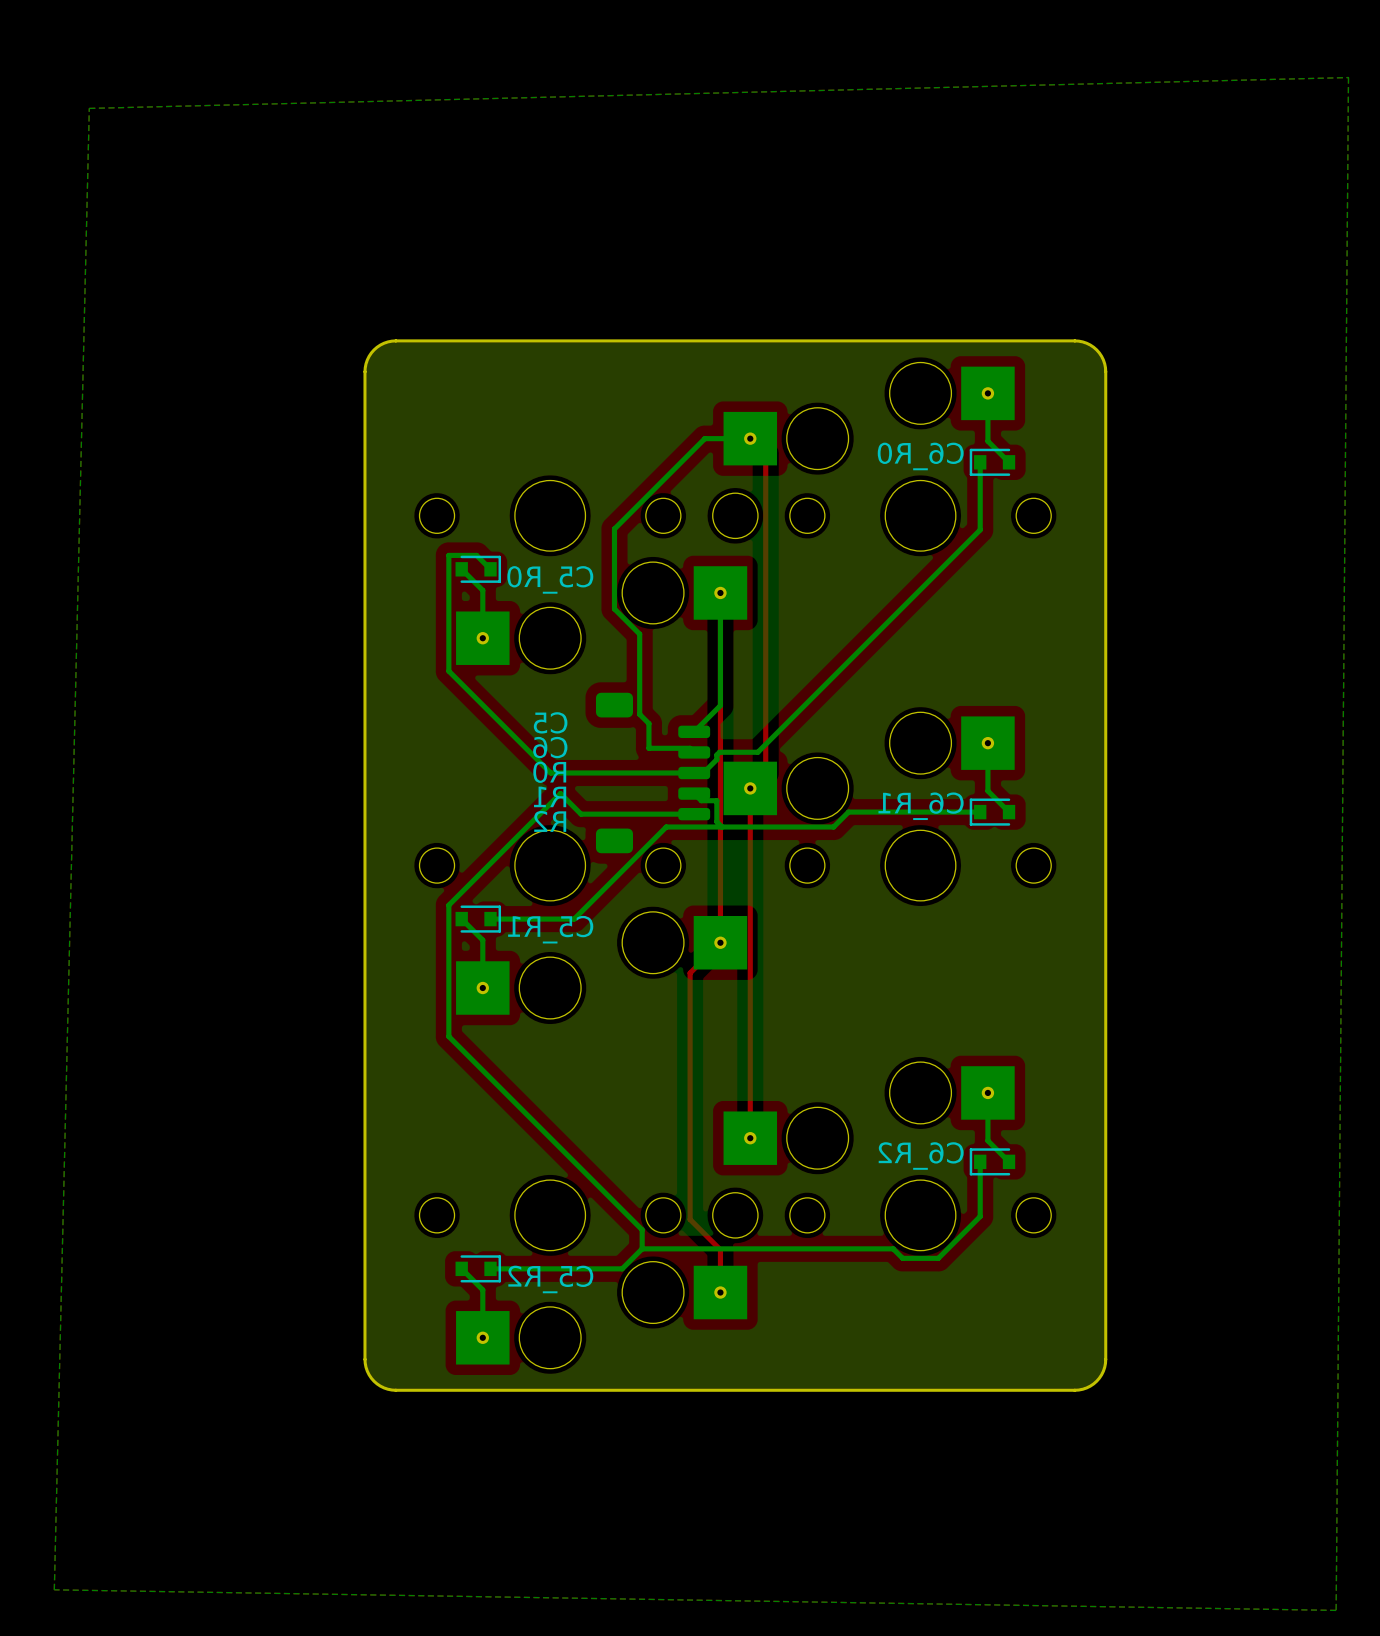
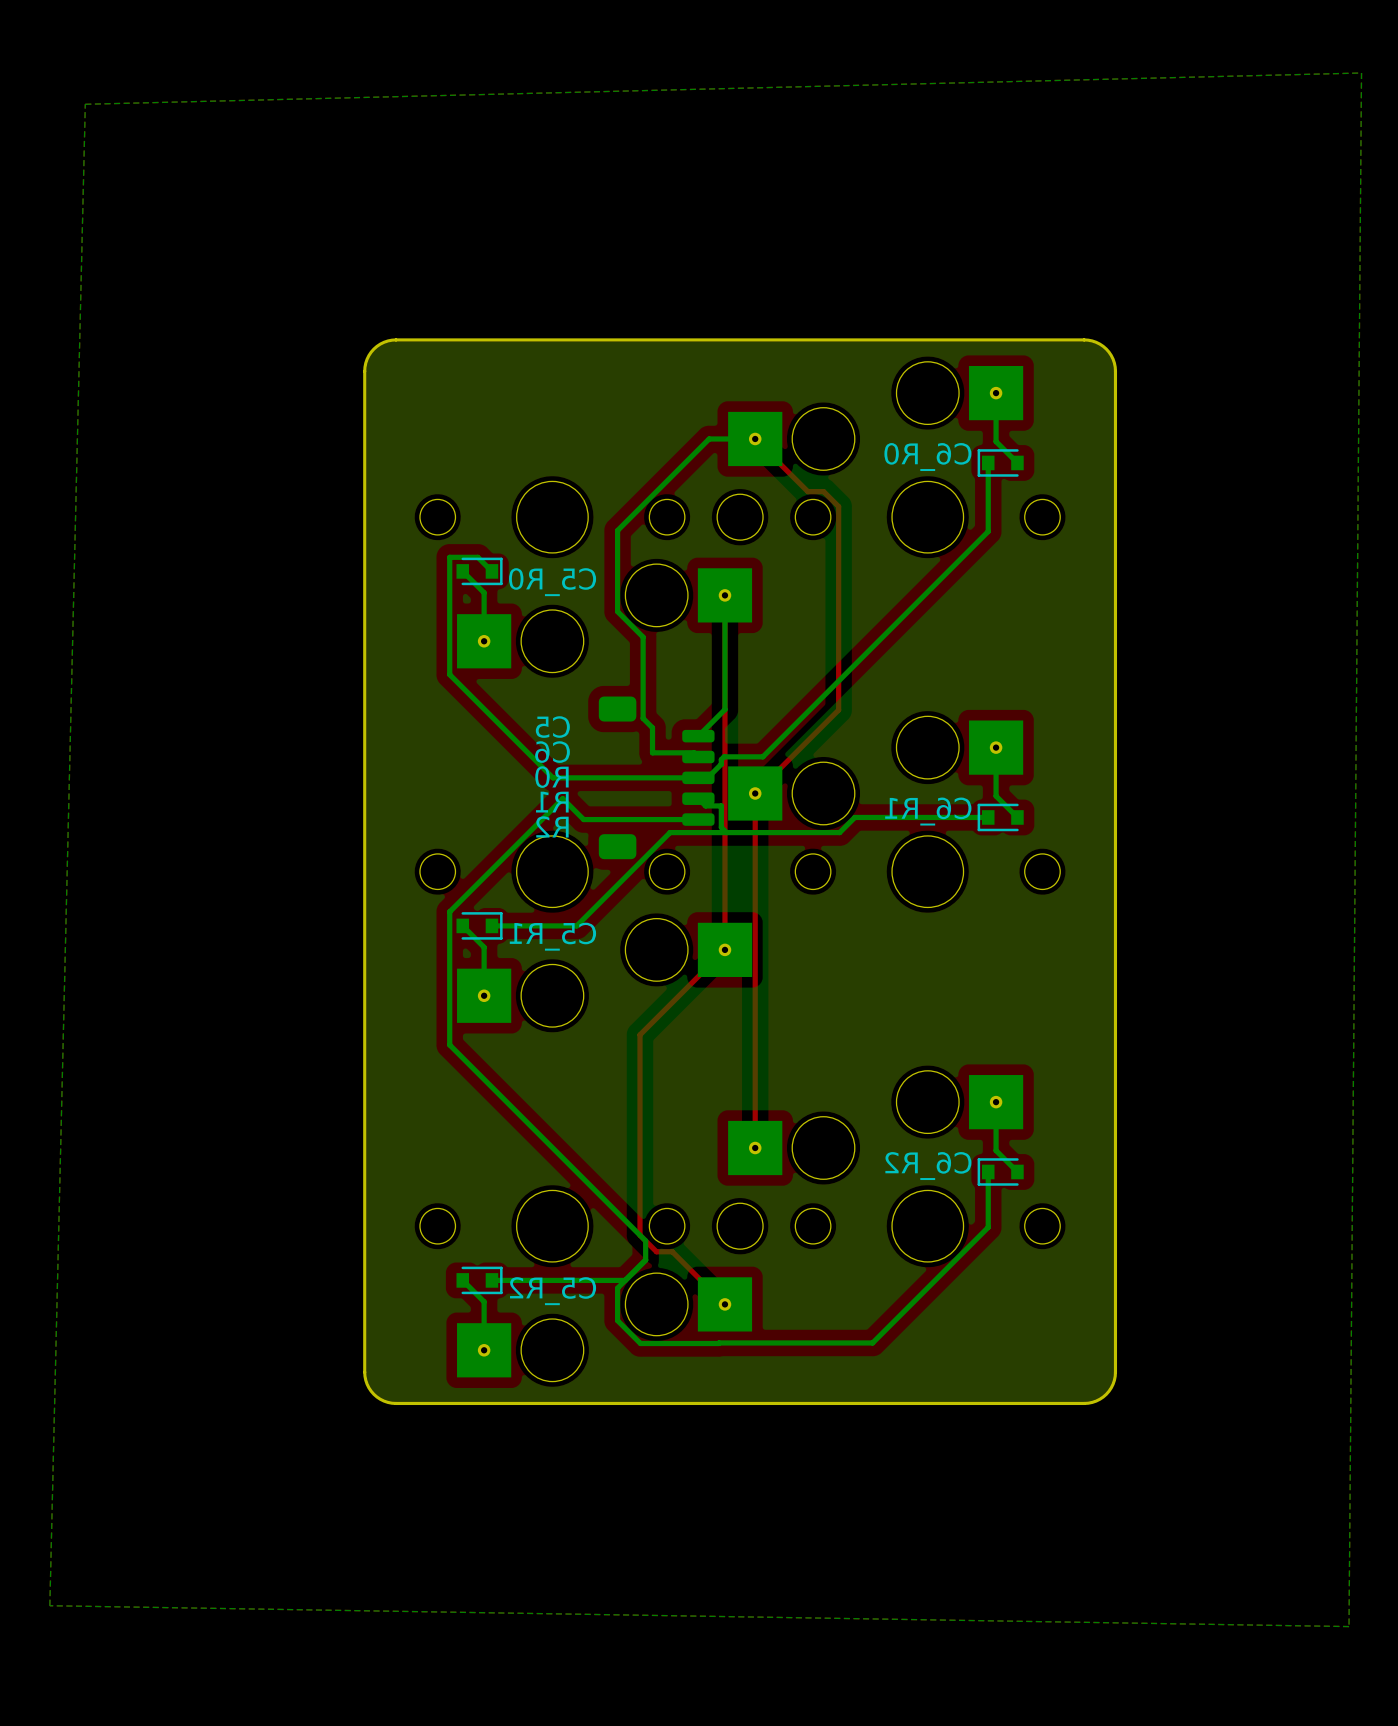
top track: (765, 454) (765, 773) -> (770, 454) (807, 491) (823, 491) (838, 506) (838, 710) (770, 777)
top track: (690, 973) (690, 1219) (720, 1249) (720, 1292) -> (694, 980) (640, 1034) (640, 1235) (656, 1251) (672, 1251) (724, 1304)
bottom track: (642, 1248) (893, 1248) (902, 1258) (938, 1258) -> (625, 1280) (617, 1288) (617, 1320) (640, 1343) (872, 1342) (945, 1269)

